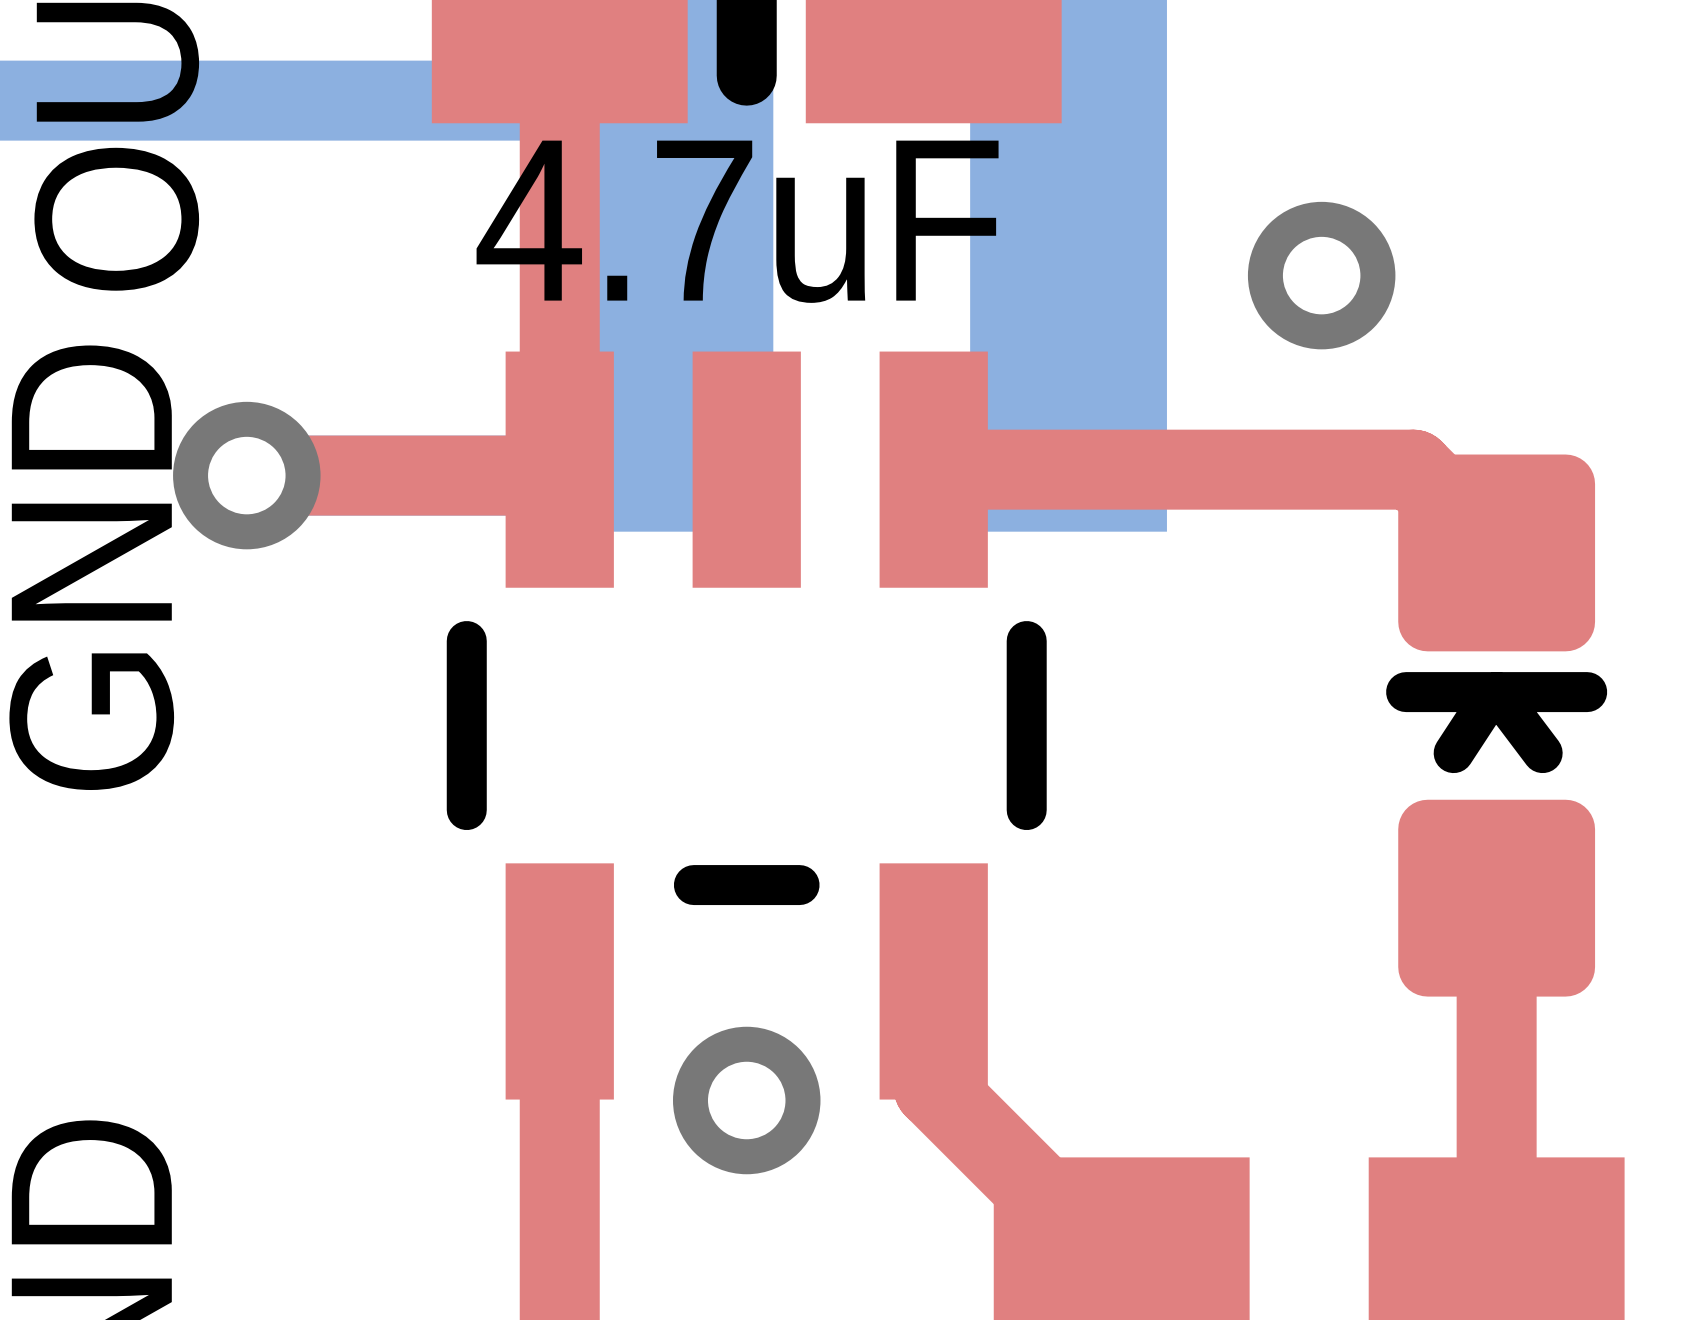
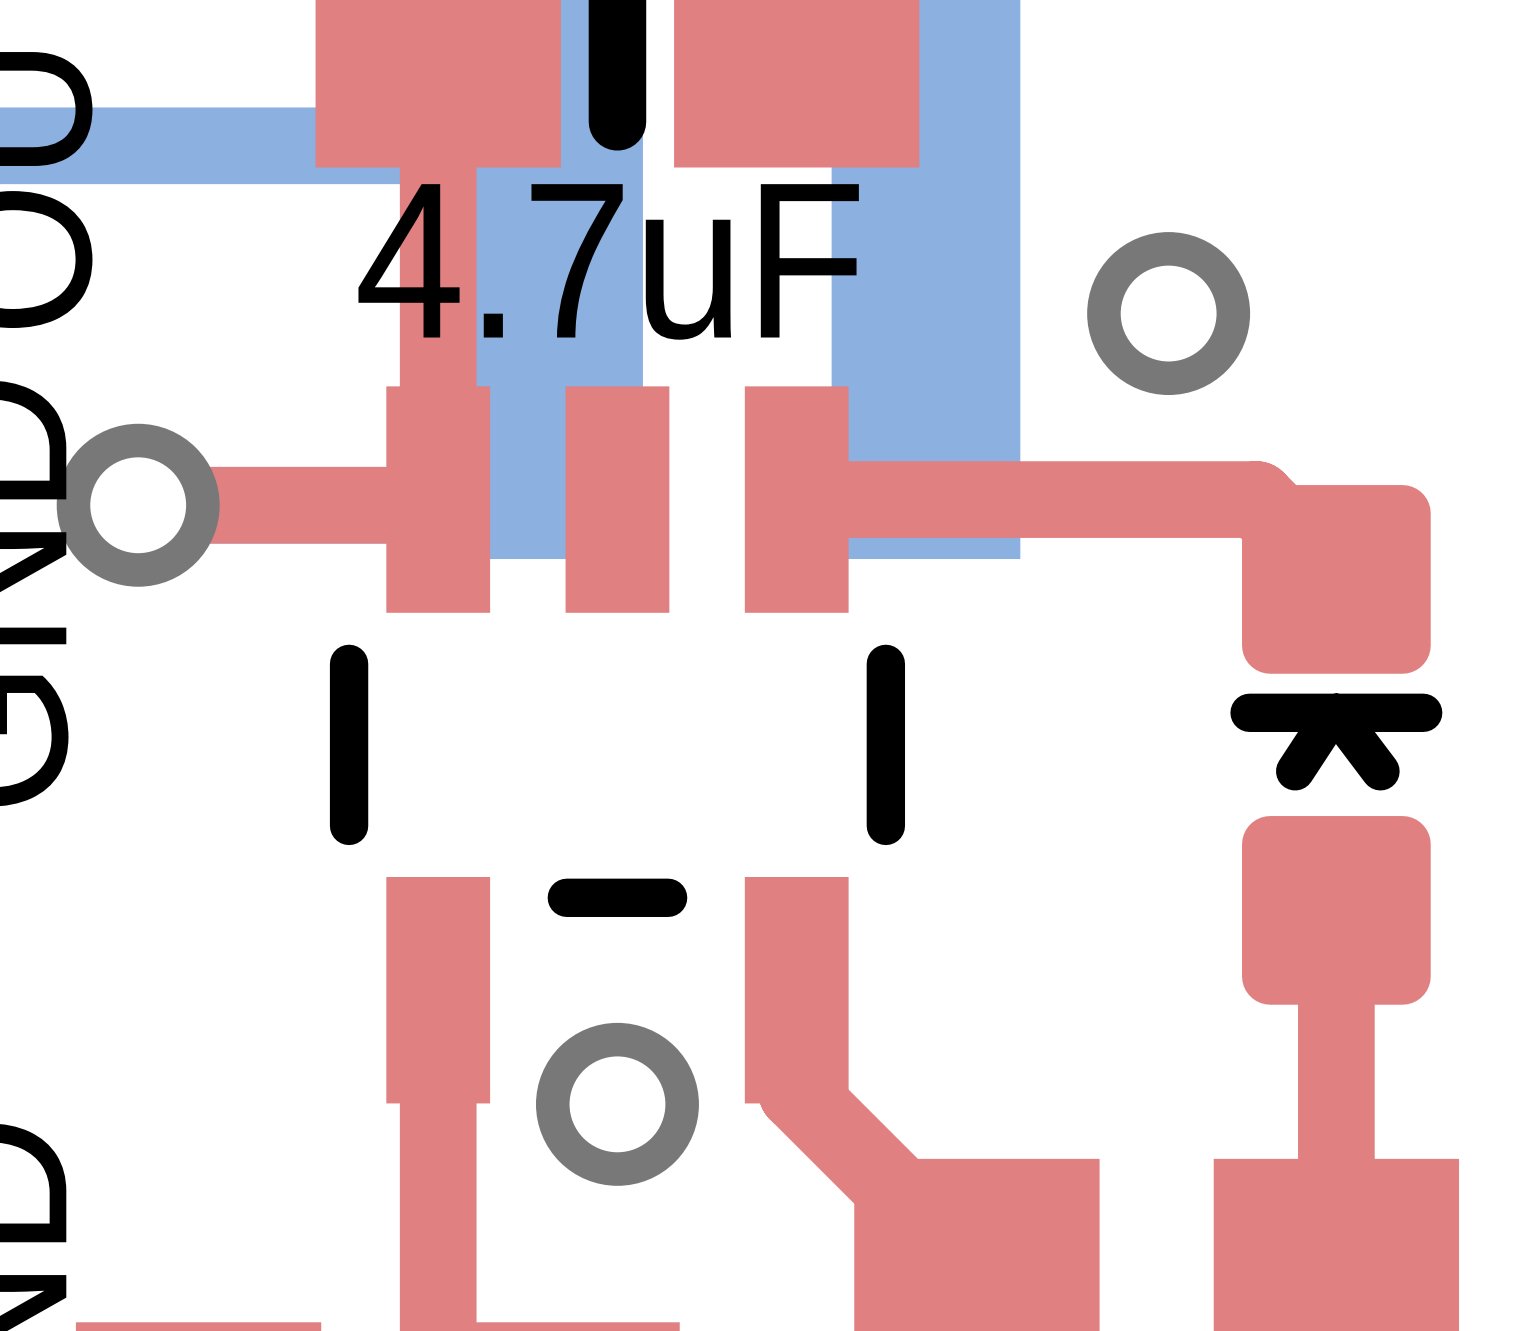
via size: [1247, 201, 1396, 350] -> [1087, 232, 1251, 396]
via size: [173, 401, 321, 550] -> [56, 423, 220, 587]
via size: [673, 1026, 821, 1175] -> [535, 1022, 699, 1186]

